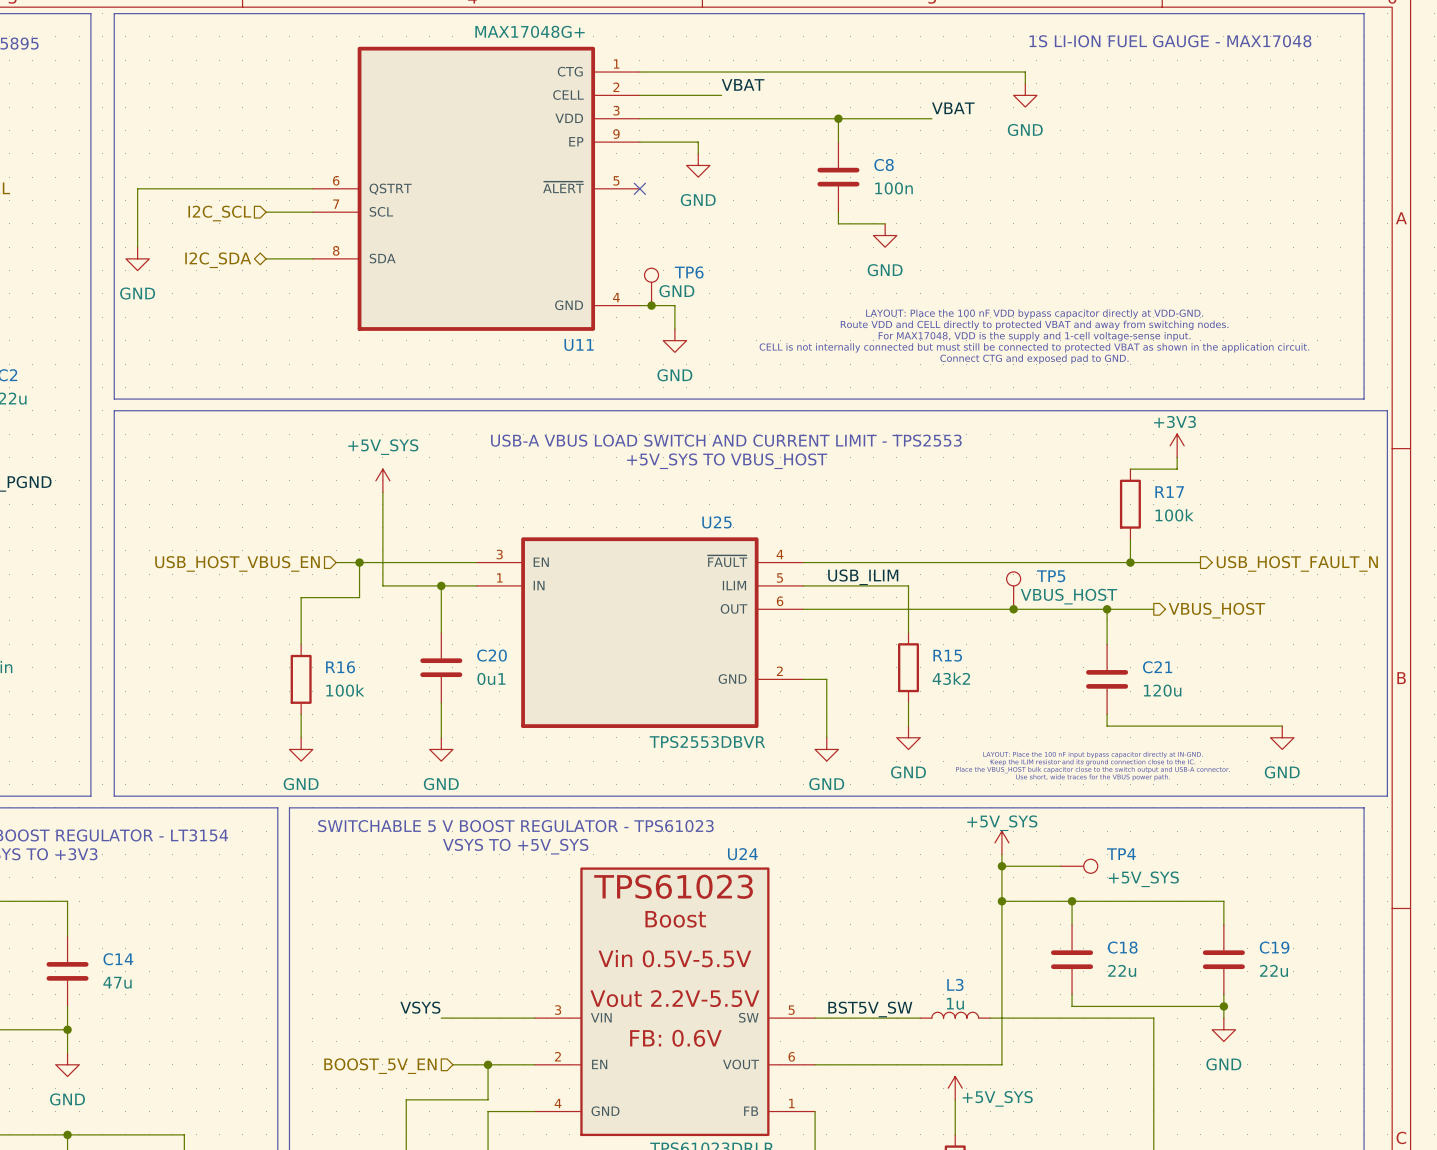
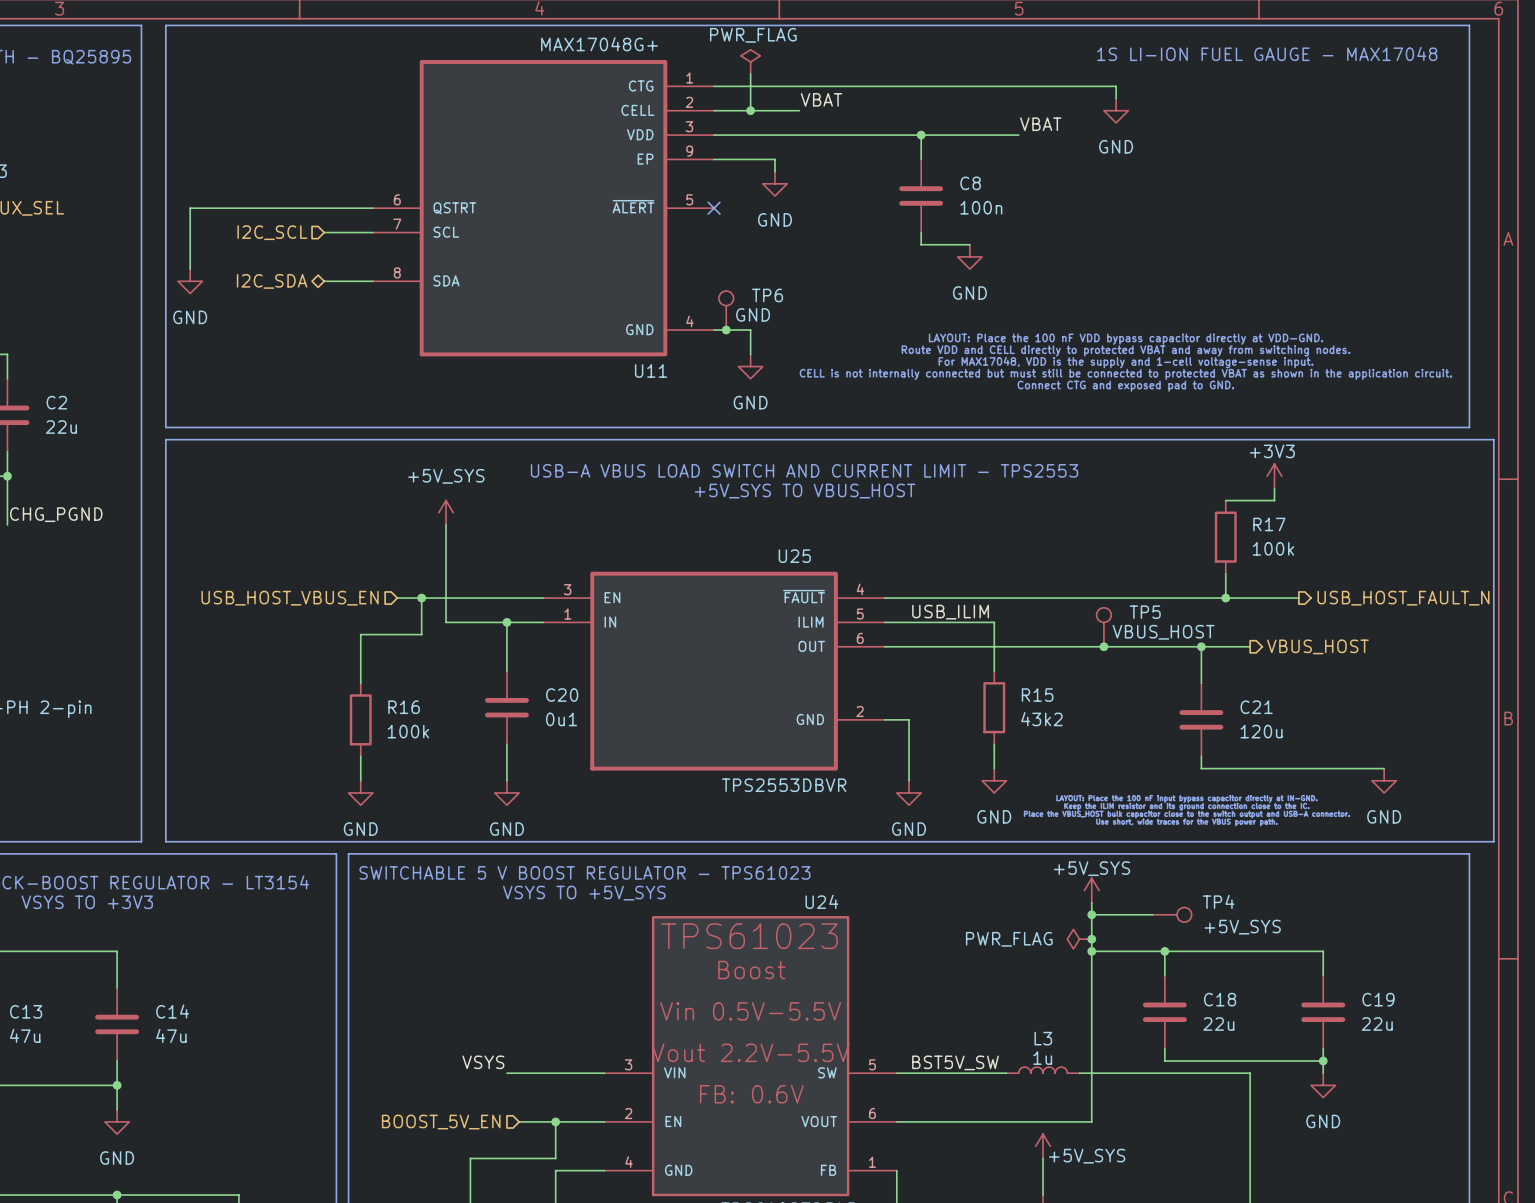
power symbol: none -> PWR_FLAG (750, 61)
wire: none -> (750, 74) (750, 110)
junction: none -> (750, 110)
power symbol: none -> PWR_FLAG (1079, 939)
junction: none -> (1091, 939)

